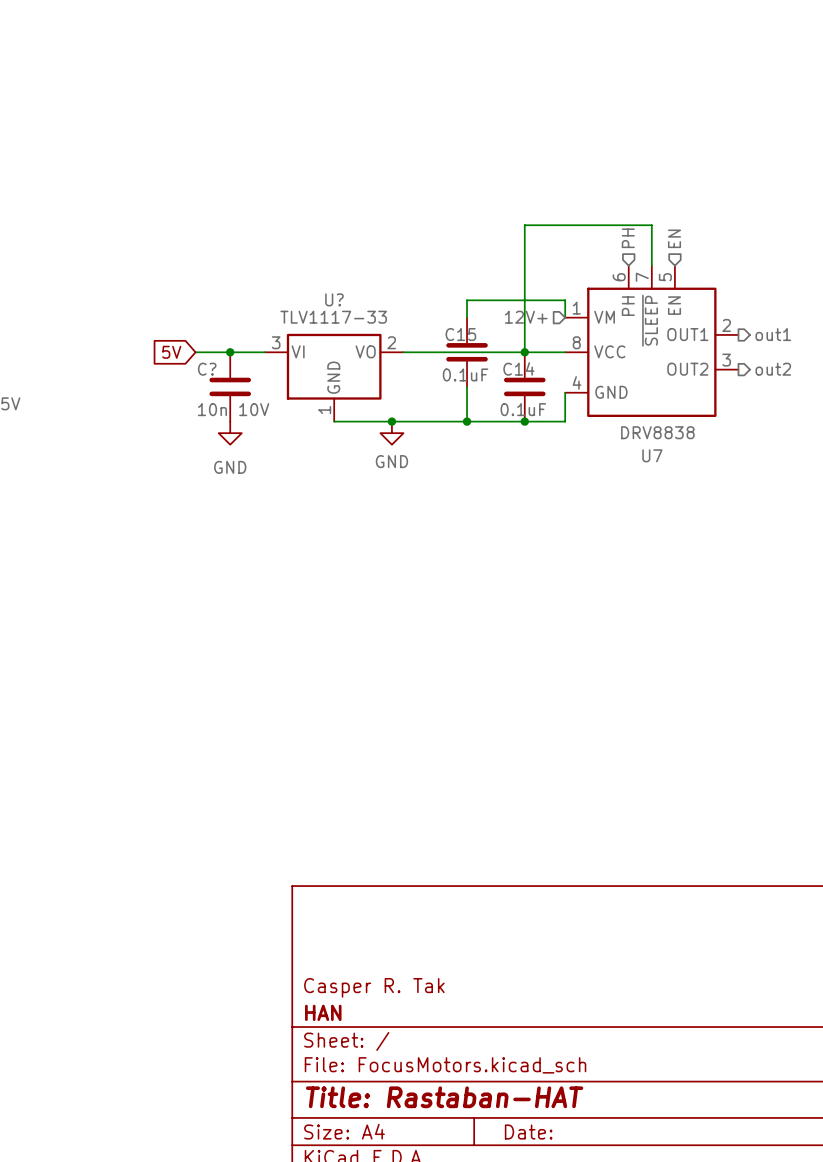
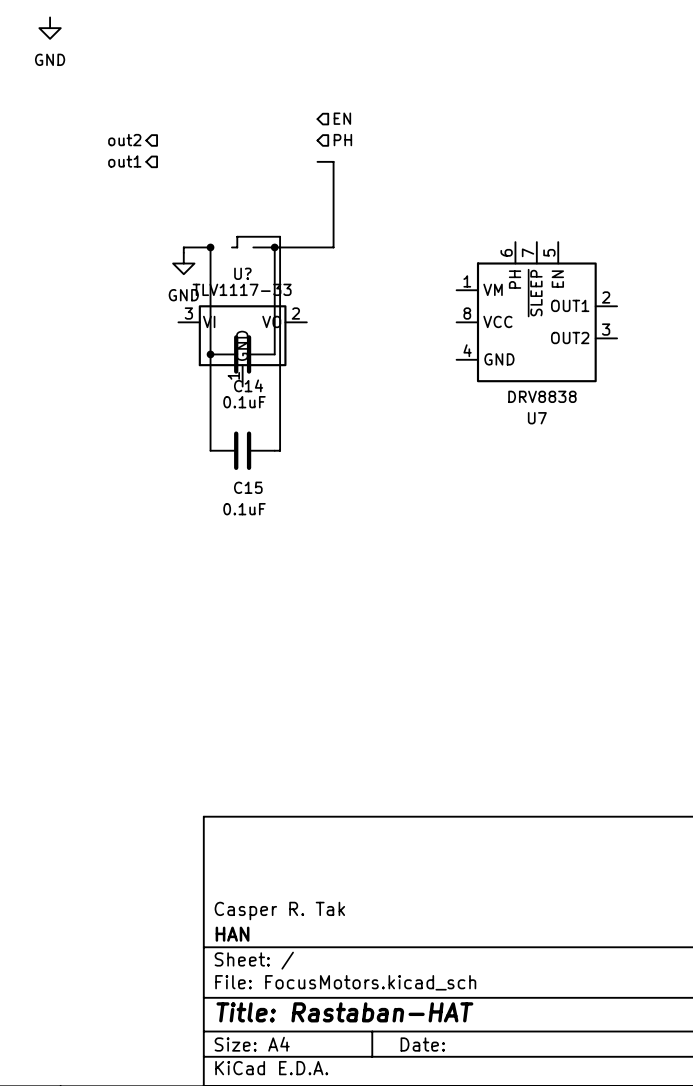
power symbol: none -> GND (50, 28)
hierarchical label: none -> EN (342, 118)
hierarchical label: none -> out2 (124, 140)
hierarchical label: none -> out1 (124, 161)
wire: none -> (317, 161) (333, 161) (333, 247) (253, 247)
hierarchical label rotation: 0° (628, 238) -> 90° clockwise (342, 140)
hierarchical label position: PH (628, 238) -> PH (342, 140)
hierarchical label: EN (674, 238) -> none
wire: (651, 265) (651, 225) (524, 225) (524, 352) -> none
junction: none -> (210, 247)
wire: none -> (231, 247) (237, 247) (237, 236) (280, 236) (280, 450) (274, 450)
wire: none -> (274, 247) (274, 354)
junction: none -> (274, 247)
wire: none -> (183, 252) (183, 247) (210, 247) (210, 450)
power symbol: none -> GND (183, 263)
wire: (467, 317) (467, 300) (565, 300) (565, 317) -> none
hierarchical label: 12V+ (526, 317) -> none
C15 name position: C15 (460, 334) -> C15 (248, 487)
hierarchical label: out1 (773, 334) -> none
global label: 5V (171, 352) -> none
wire: (195, 352) (264, 352) -> none
junction: (230, 352) -> none
wire: (403, 352) (565, 352) -> none
C15 rotation: 0° (467, 352) -> 90° clockwise (242, 450)
C15 position: (467, 352) -> (242, 450)
junction: (524, 352) -> none
C14 name position: C14 (518, 368) -> C14 (248, 385)
hierarchical label: out2 (773, 369) -> none
C15 value position: 0.1uF (465, 374) -> 0.1uF (244, 509)
C?: 10n 10V (230, 386) -> none
junction: none -> (210, 354)
wire: (467, 386) (467, 421) -> none
C14 rotation: 0° (524, 386) -> 90° clockwise (242, 354)
C14 position: (524, 386) -> (242, 354)
wire: (565, 392) (565, 421) (334, 421) -> none
C14 value position: 0.1uF (523, 409) -> 0.1uF (244, 402)
junction: (391, 421) -> none
junction: (467, 421) -> none
junction: (524, 421) -> none
power symbol: GND (230, 433) -> none
power symbol: GND (391, 433) -> none

